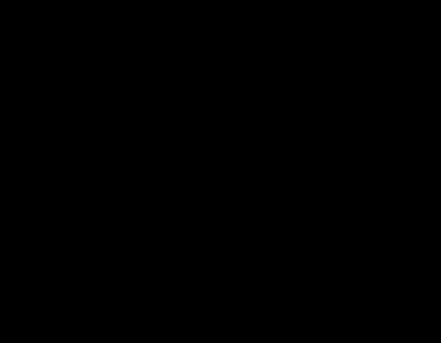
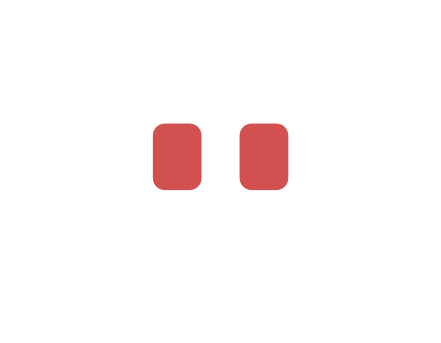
part: none -> (220, 156)

